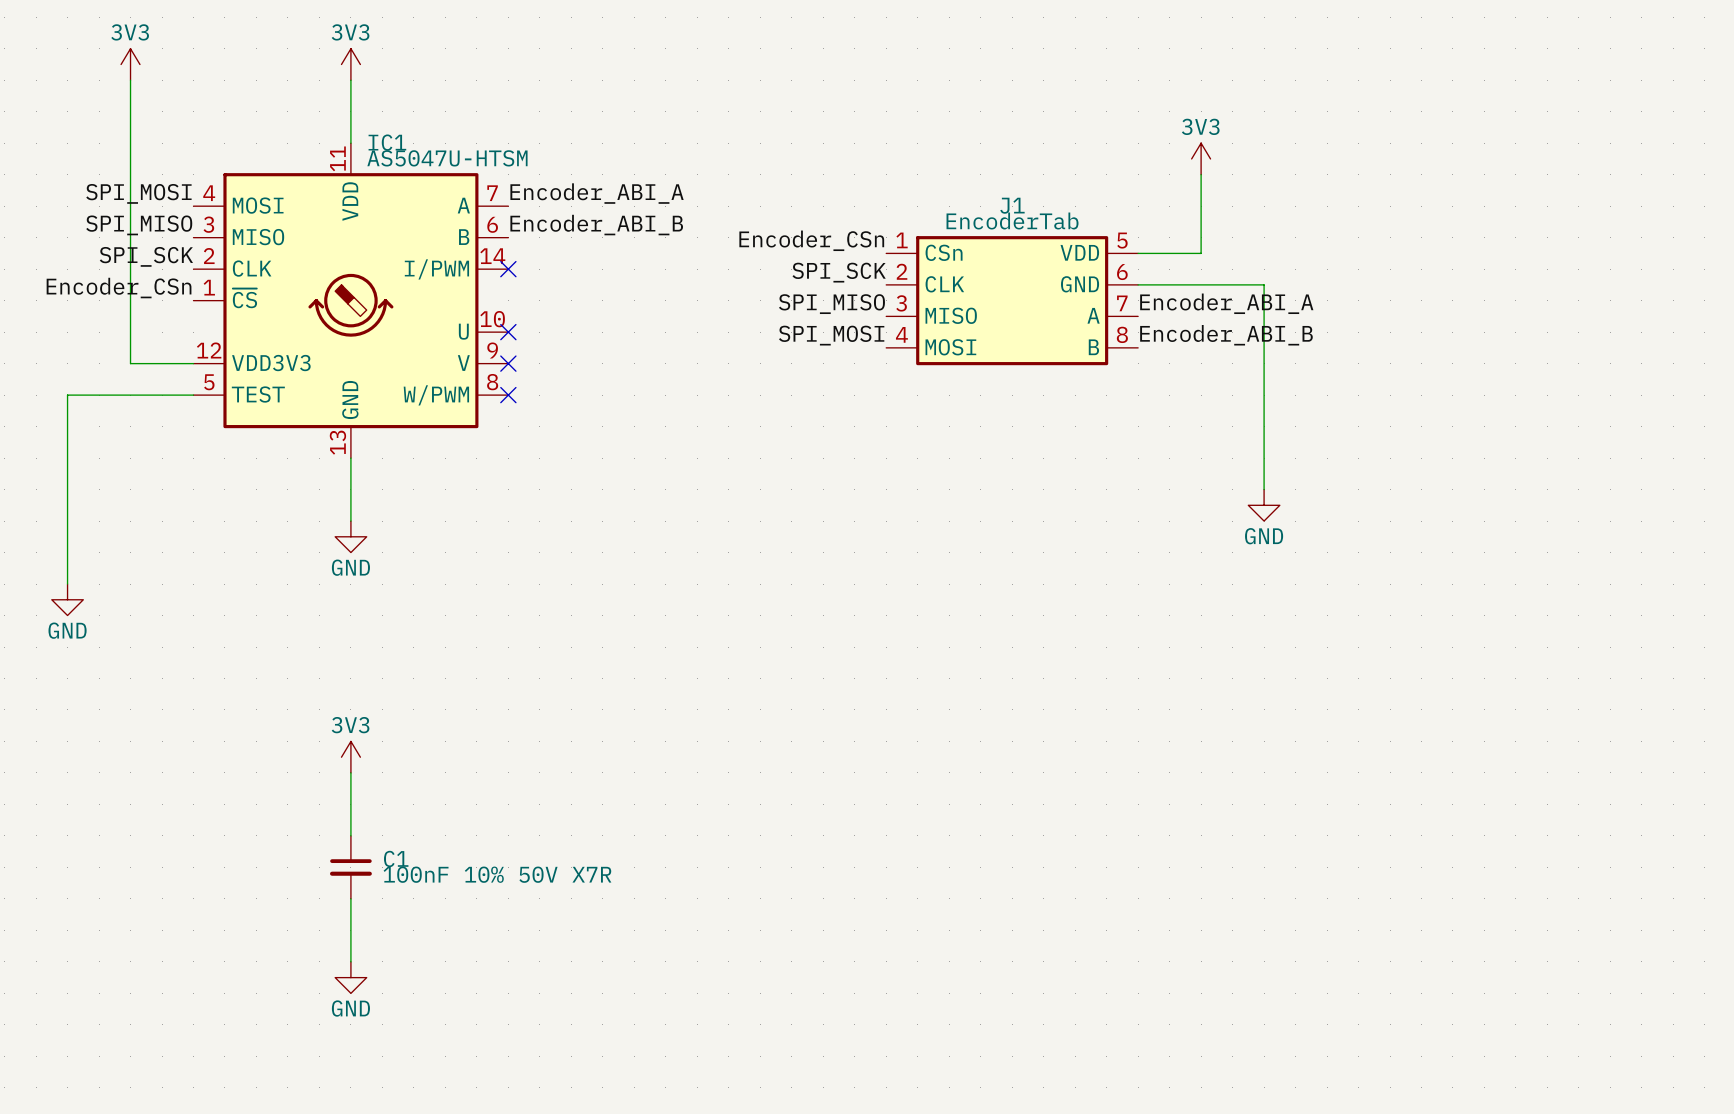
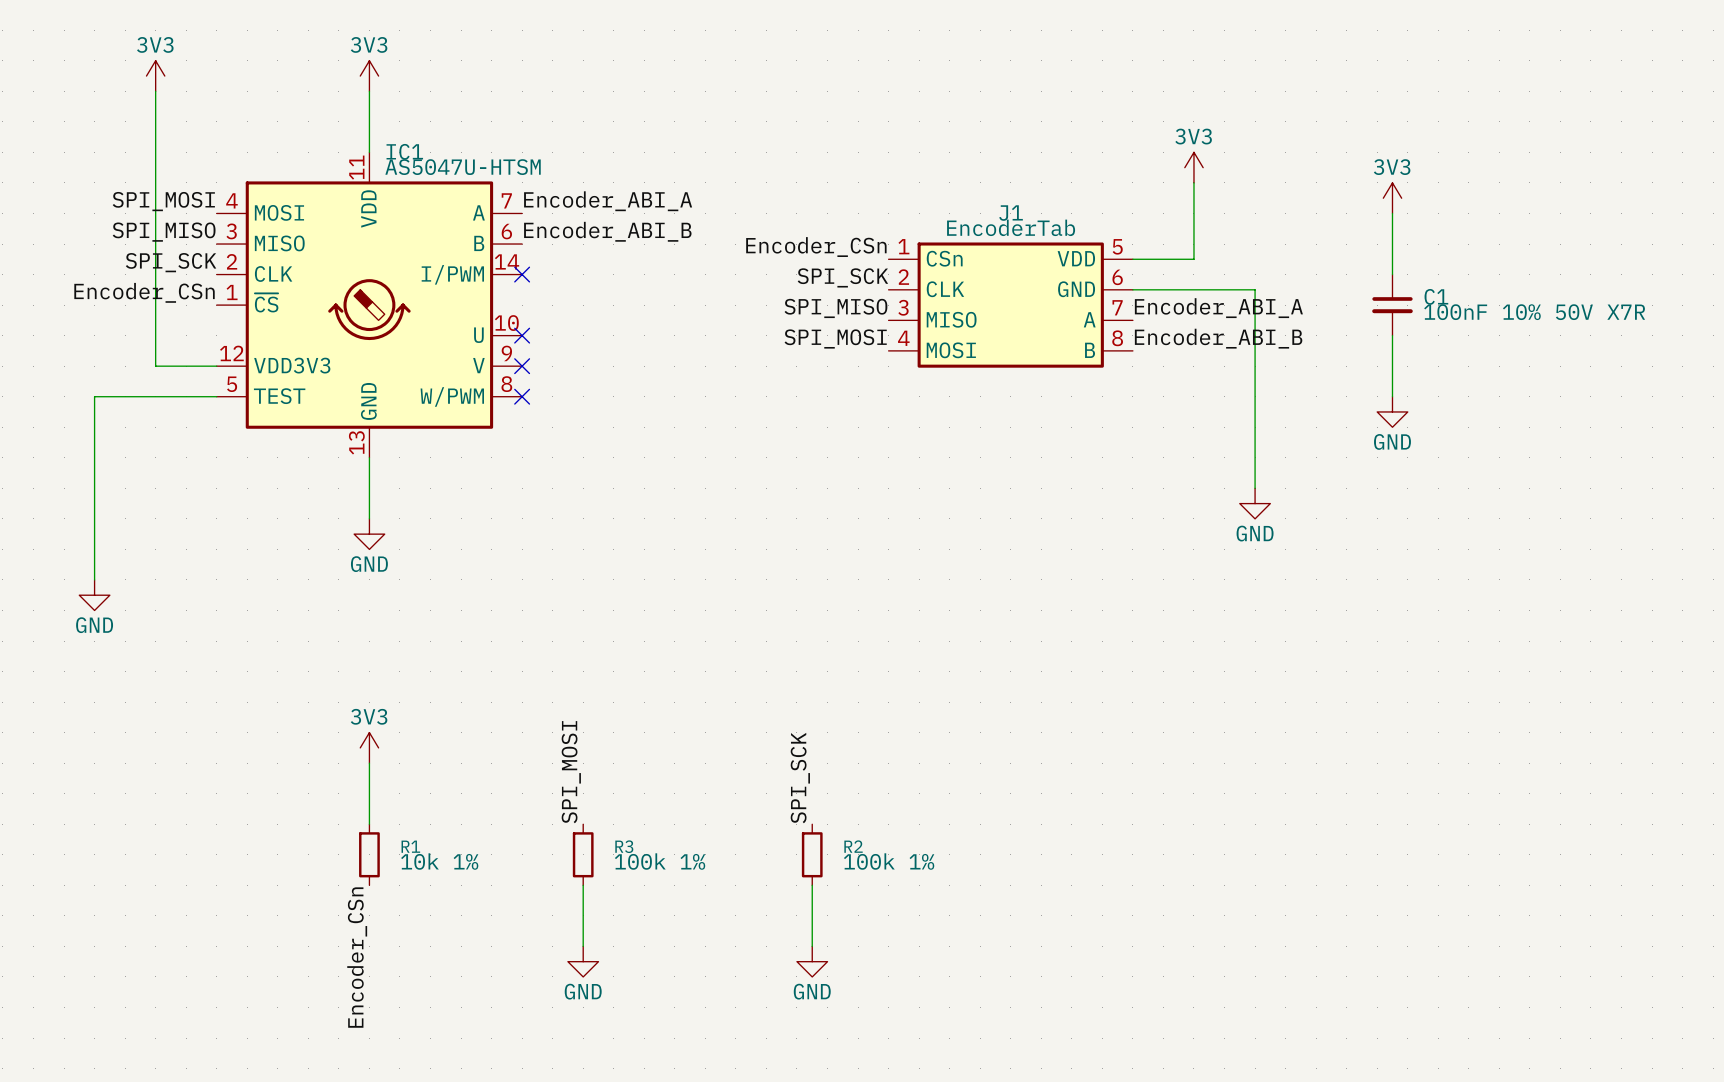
power symbol: none -> 3V3 (1392, 198)
wire: none -> (1392, 213) (1392, 274)
wire: none -> (1392, 335) (1392, 396)
power symbol: none -> GND (1392, 411)
label: none -> SPI_MOSI (571, 772)
label: none -> SPI_SCK (800, 778)
C1 position: (350, 867) -> (1392, 305)
R1: none -> 10k 1% (369, 854)
R3: none -> 100k 1% (583, 854)
R2: none -> 100k 1% (812, 854)
wire: (350, 898) (350, 961) -> (583, 885) (583, 946)
wire: none -> (812, 885) (812, 946)
label: none -> Encoder_CSn (357, 957)
power symbol position: GND (350, 977) -> GND (583, 961)
power symbol: none -> GND (812, 961)

